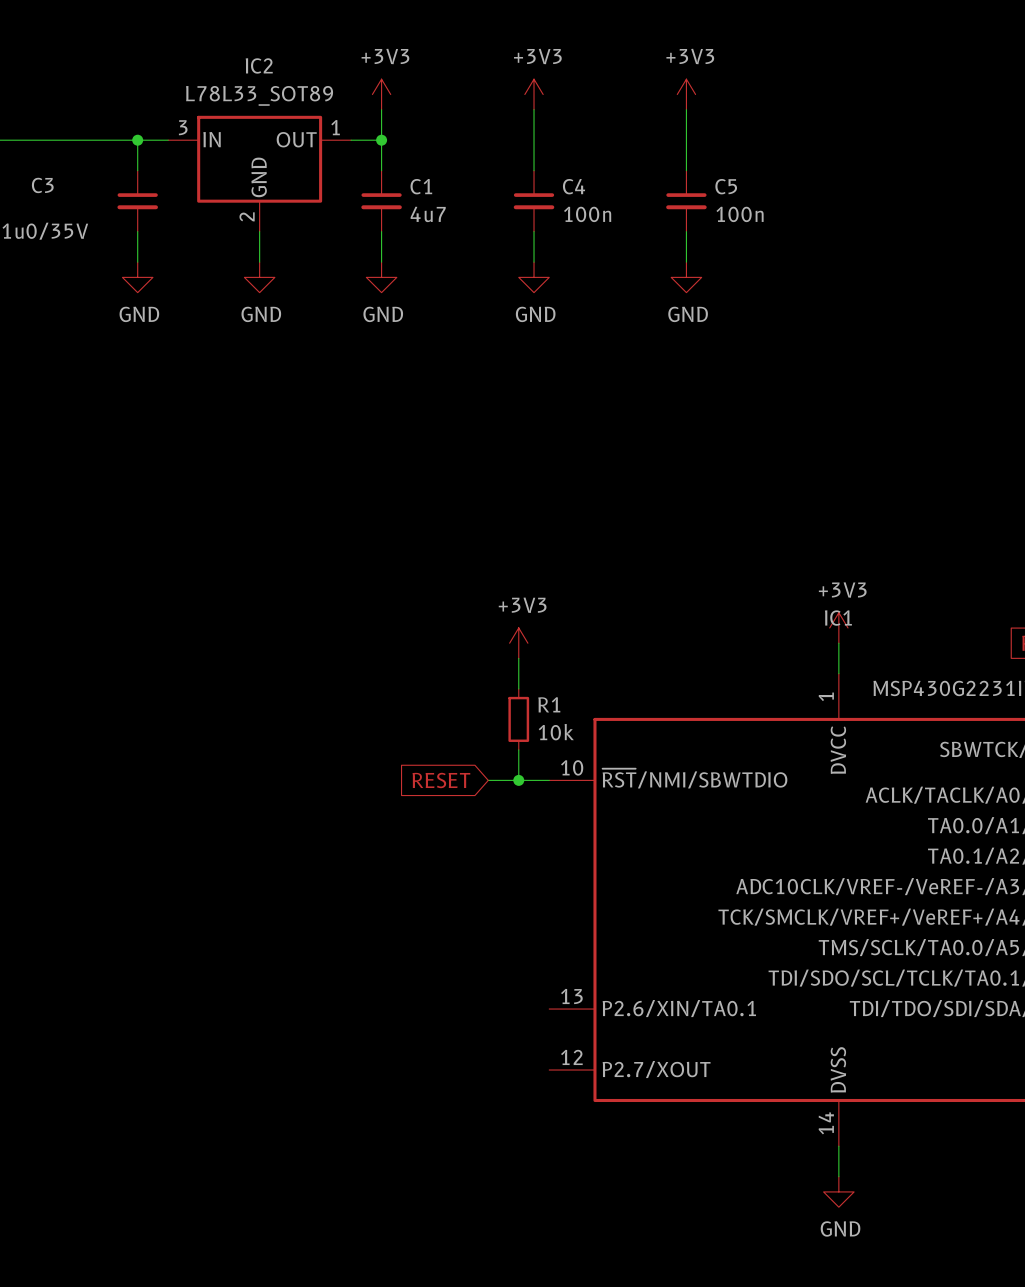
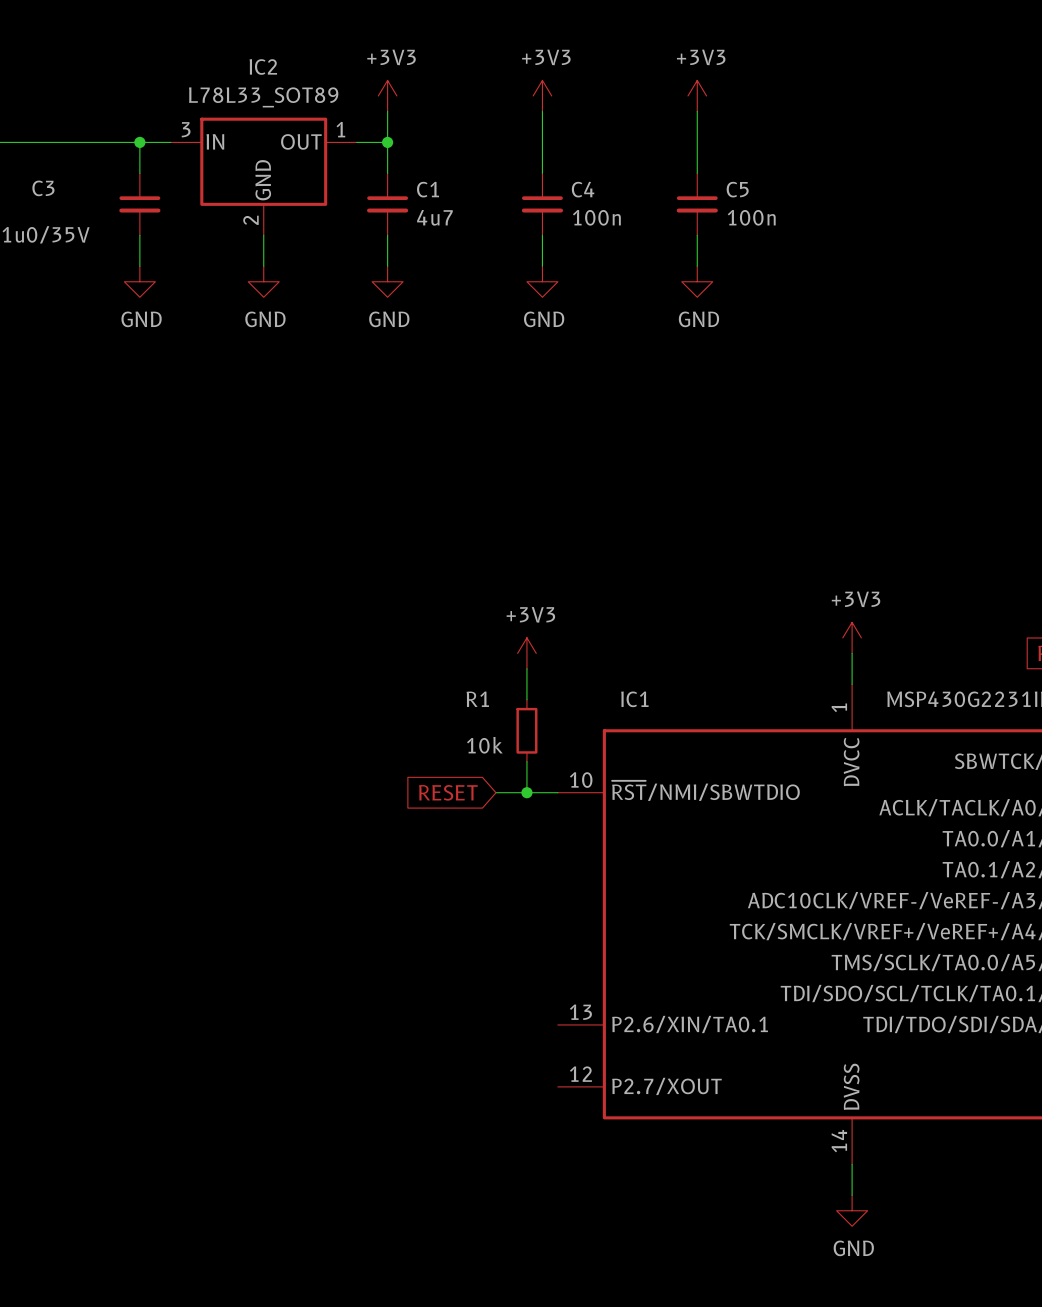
IC1 name position: IC1 (838, 618) -> IC1 (634, 699)
R1 name position: R1 (549, 704) -> R1 (477, 699)
R1 value position: 10k (556, 732) -> 10k (484, 745)

